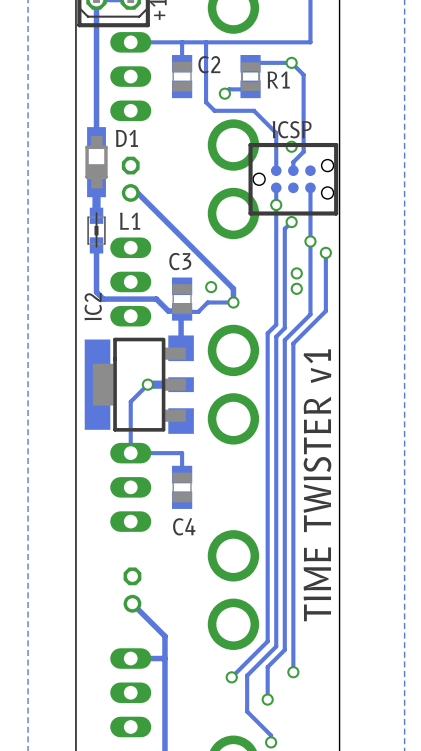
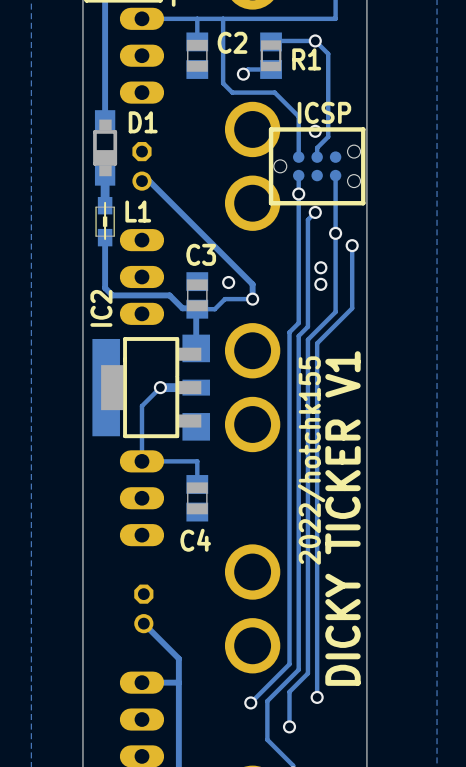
text: none -> 2022/hotchk155 (311, 460)
text: TIME TWISTER v1 (317, 485) -> DICKY TICKER V1 (342, 518)

